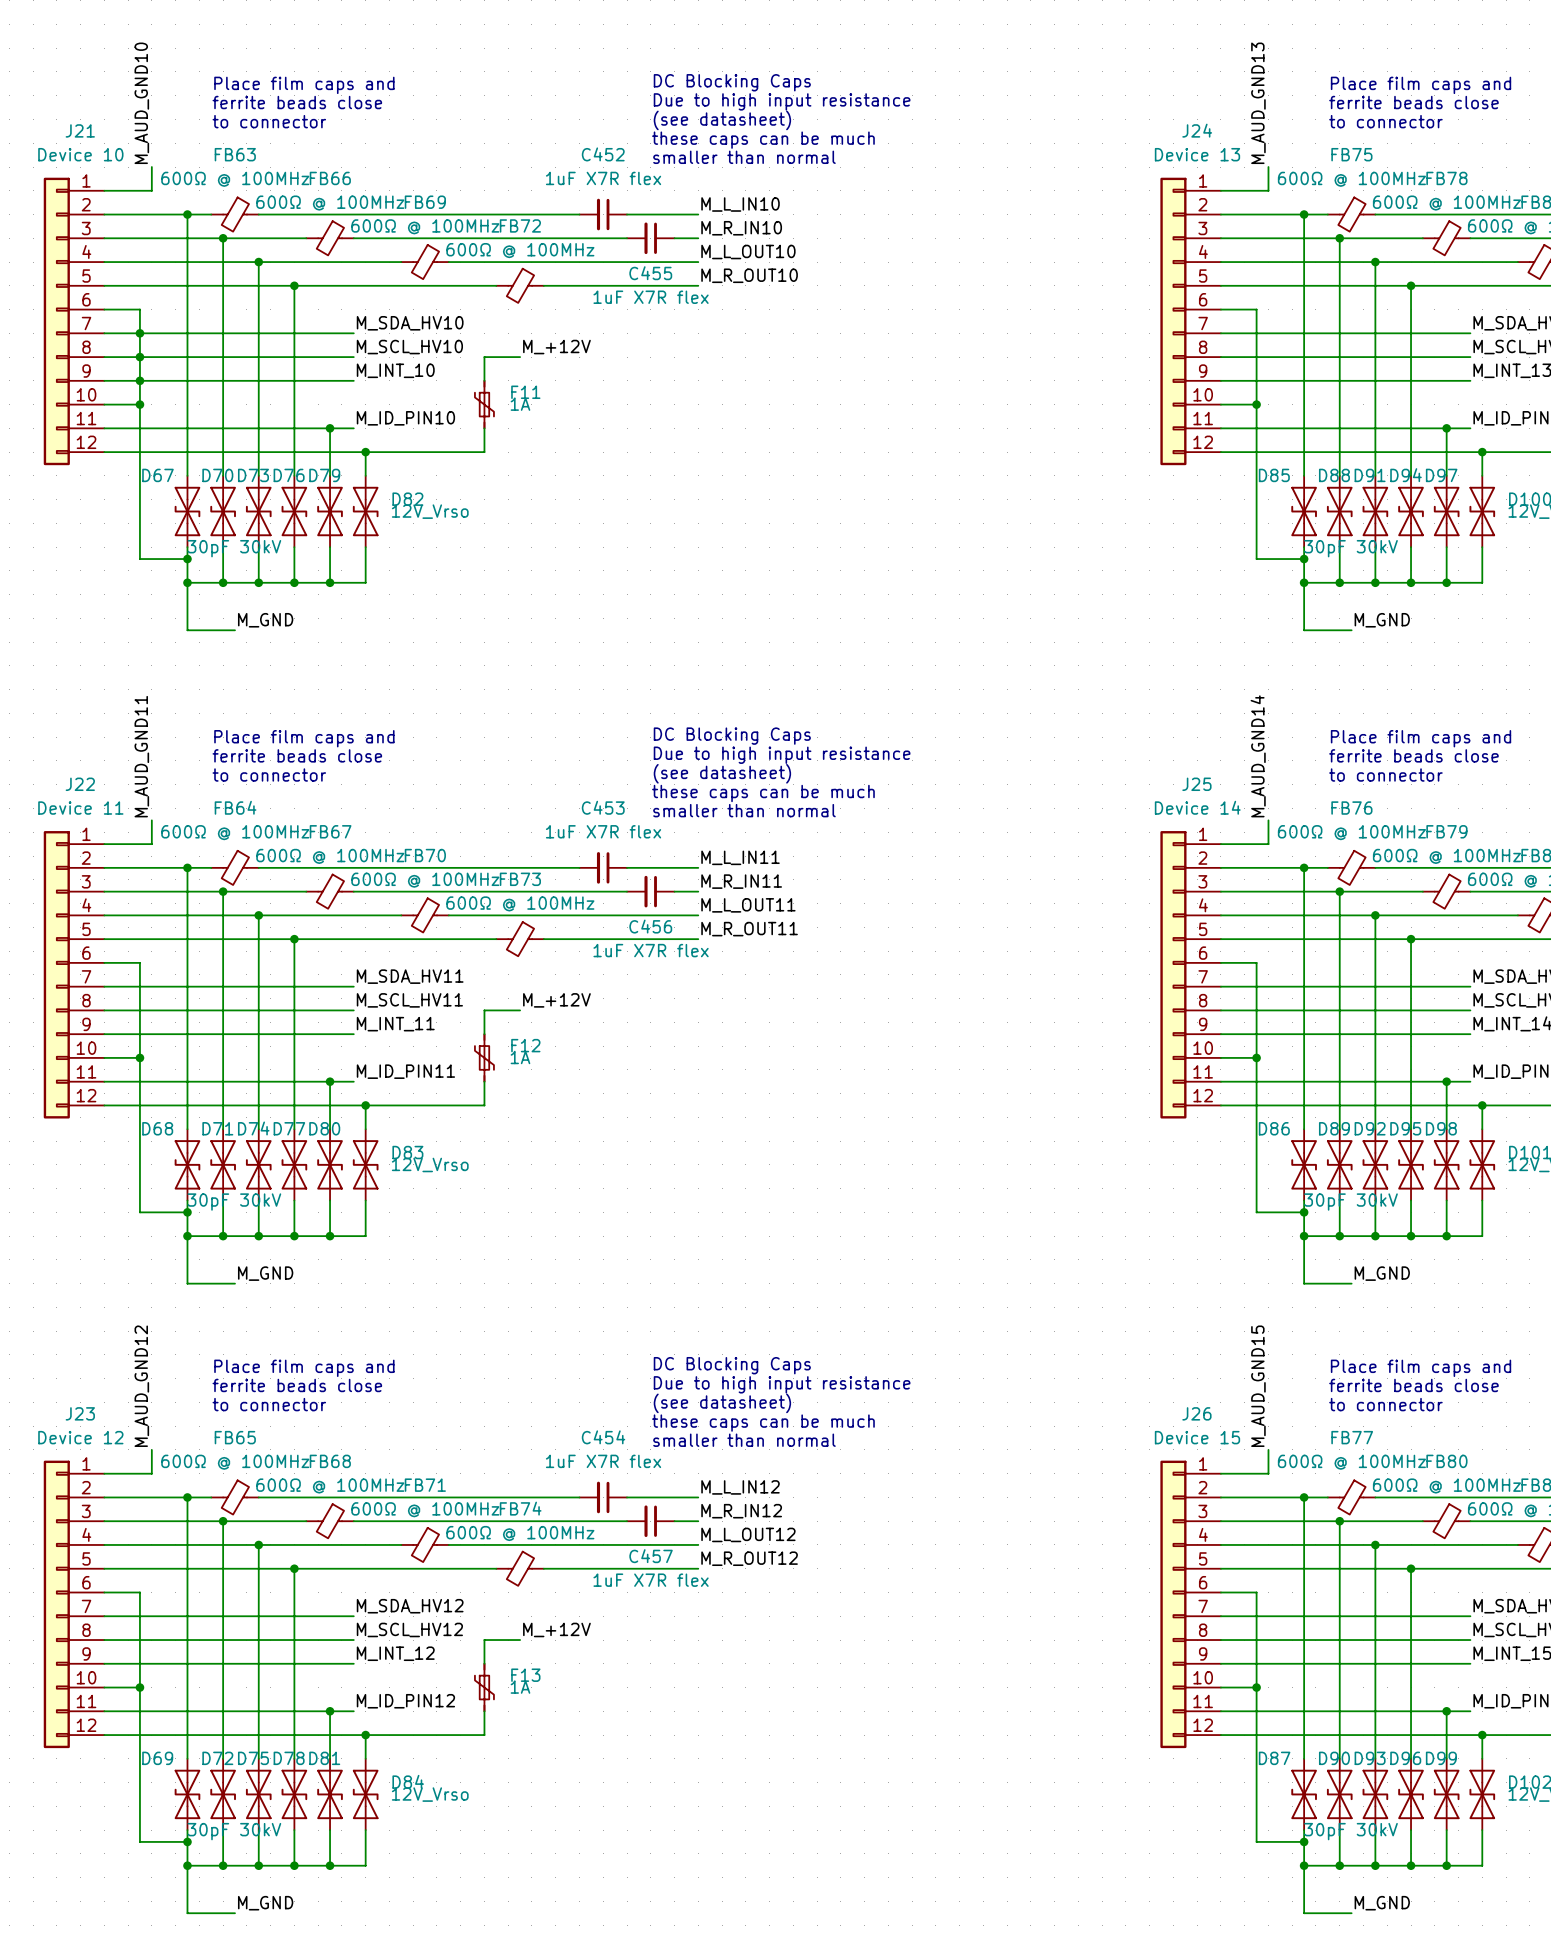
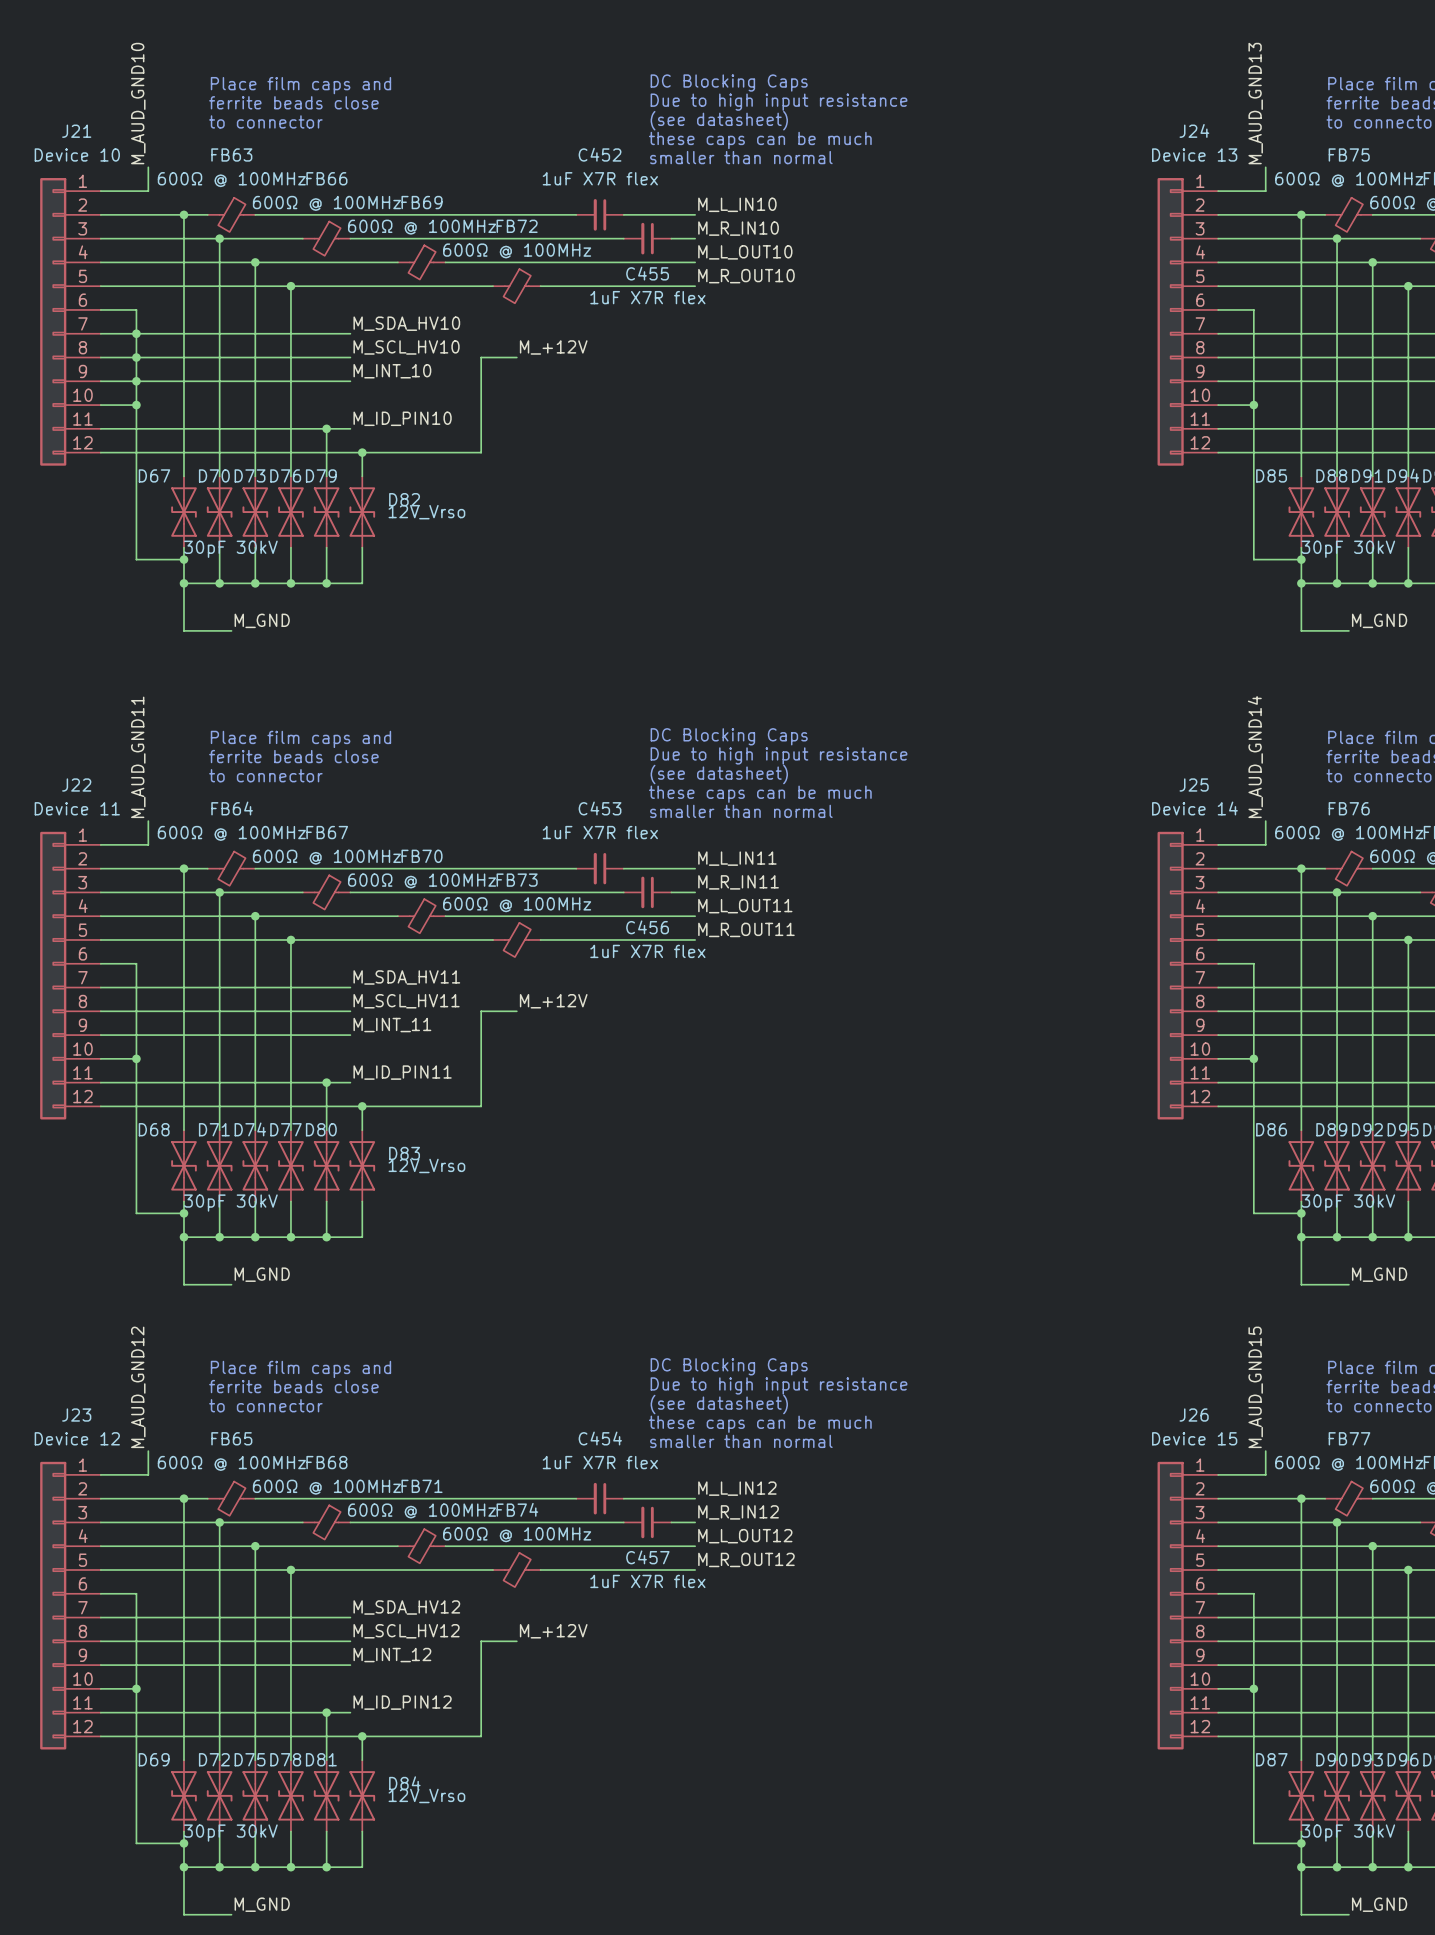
F11: 1A (484, 404) -> none
F12: 1A (484, 1057) -> none
F13: 1A (484, 1687) -> none

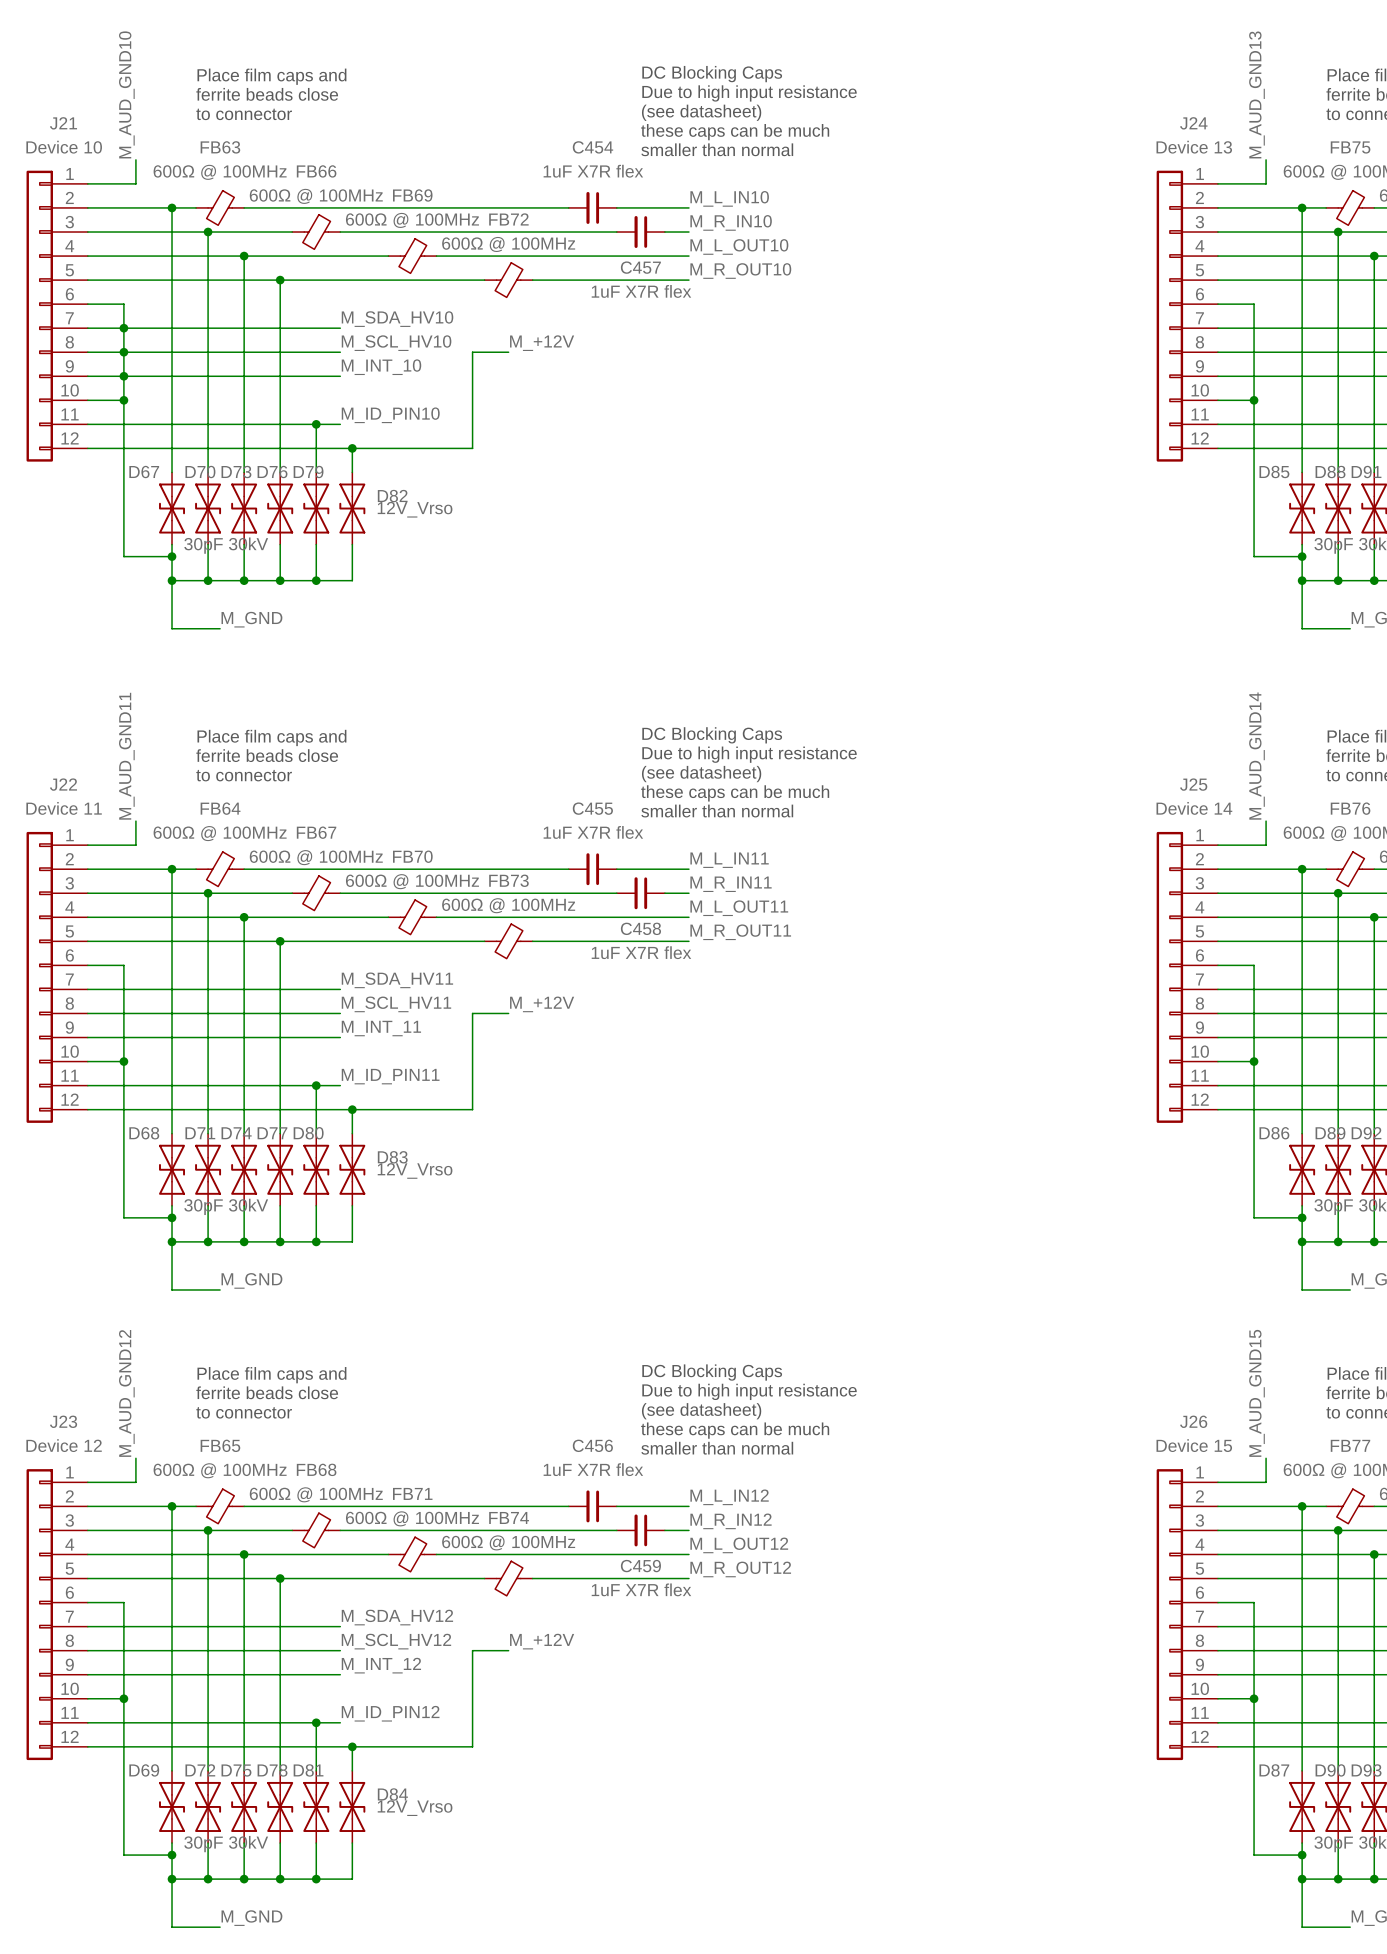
C452 name: C452 (600, 154) -> C454 (592, 147)
C455 name: C455 (647, 273) -> C457 (640, 267)
C453 name: C453 (600, 808) -> C455 (592, 808)
C456 name: C456 (647, 927) -> C458 (640, 928)
C454 name: C454 (600, 1438) -> C456 (592, 1445)
C457 name: C457 (647, 1557) -> C459 (640, 1566)

